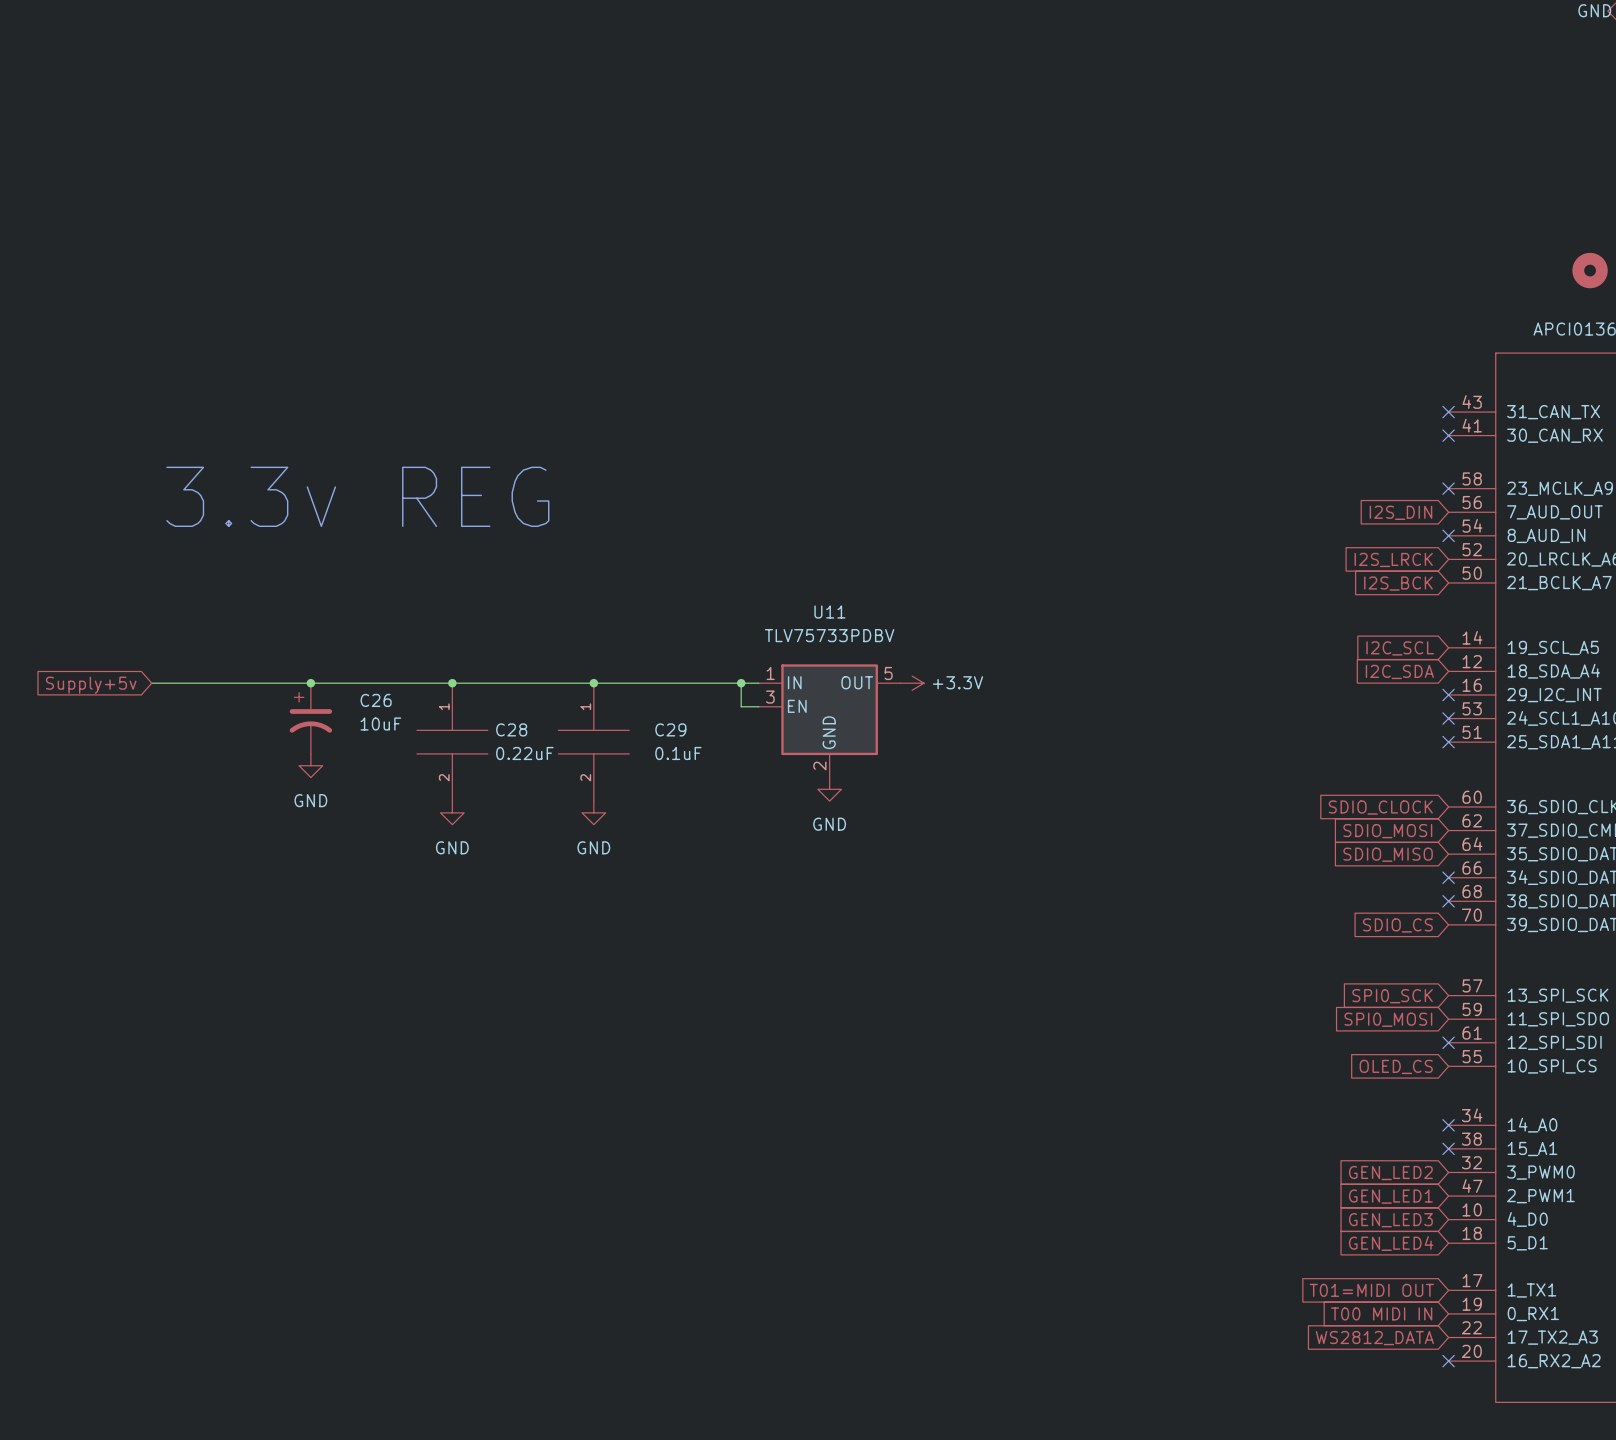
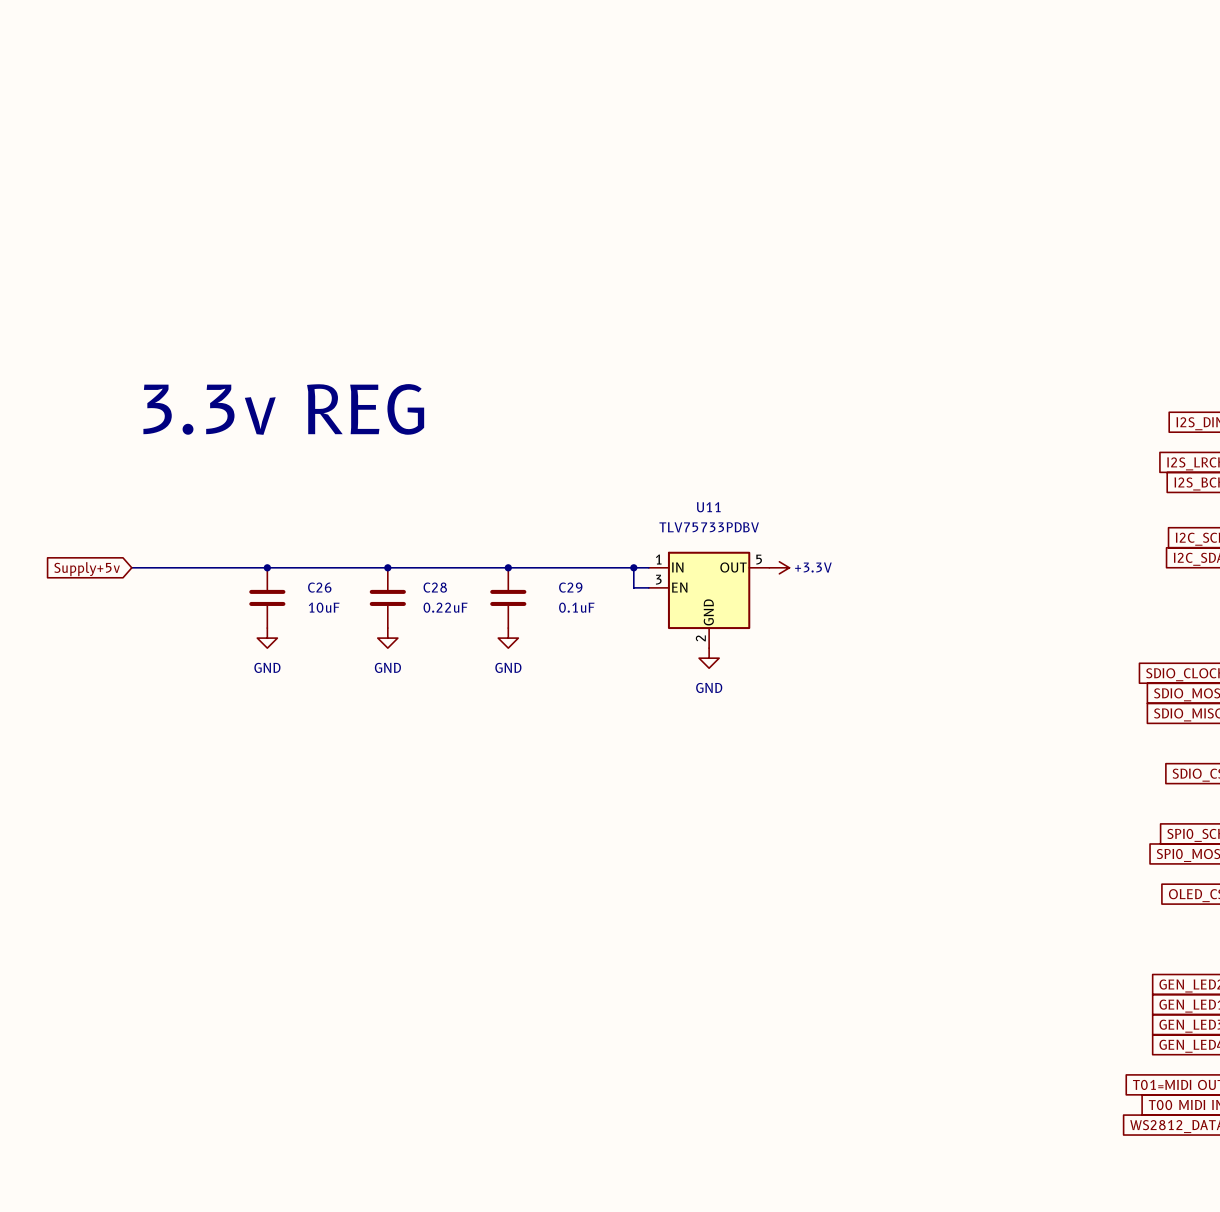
C26 symbol: [289, 683, 333, 754] -> [249, 567, 286, 629]
C28 symbol: [416, 683, 488, 802] -> [369, 567, 406, 629]
C29 symbol: [558, 683, 630, 802] -> [490, 567, 527, 629]
power symbol position: GND (452, 812) -> GND (387, 638)
power symbol position: GND (593, 812) -> GND (508, 638)

